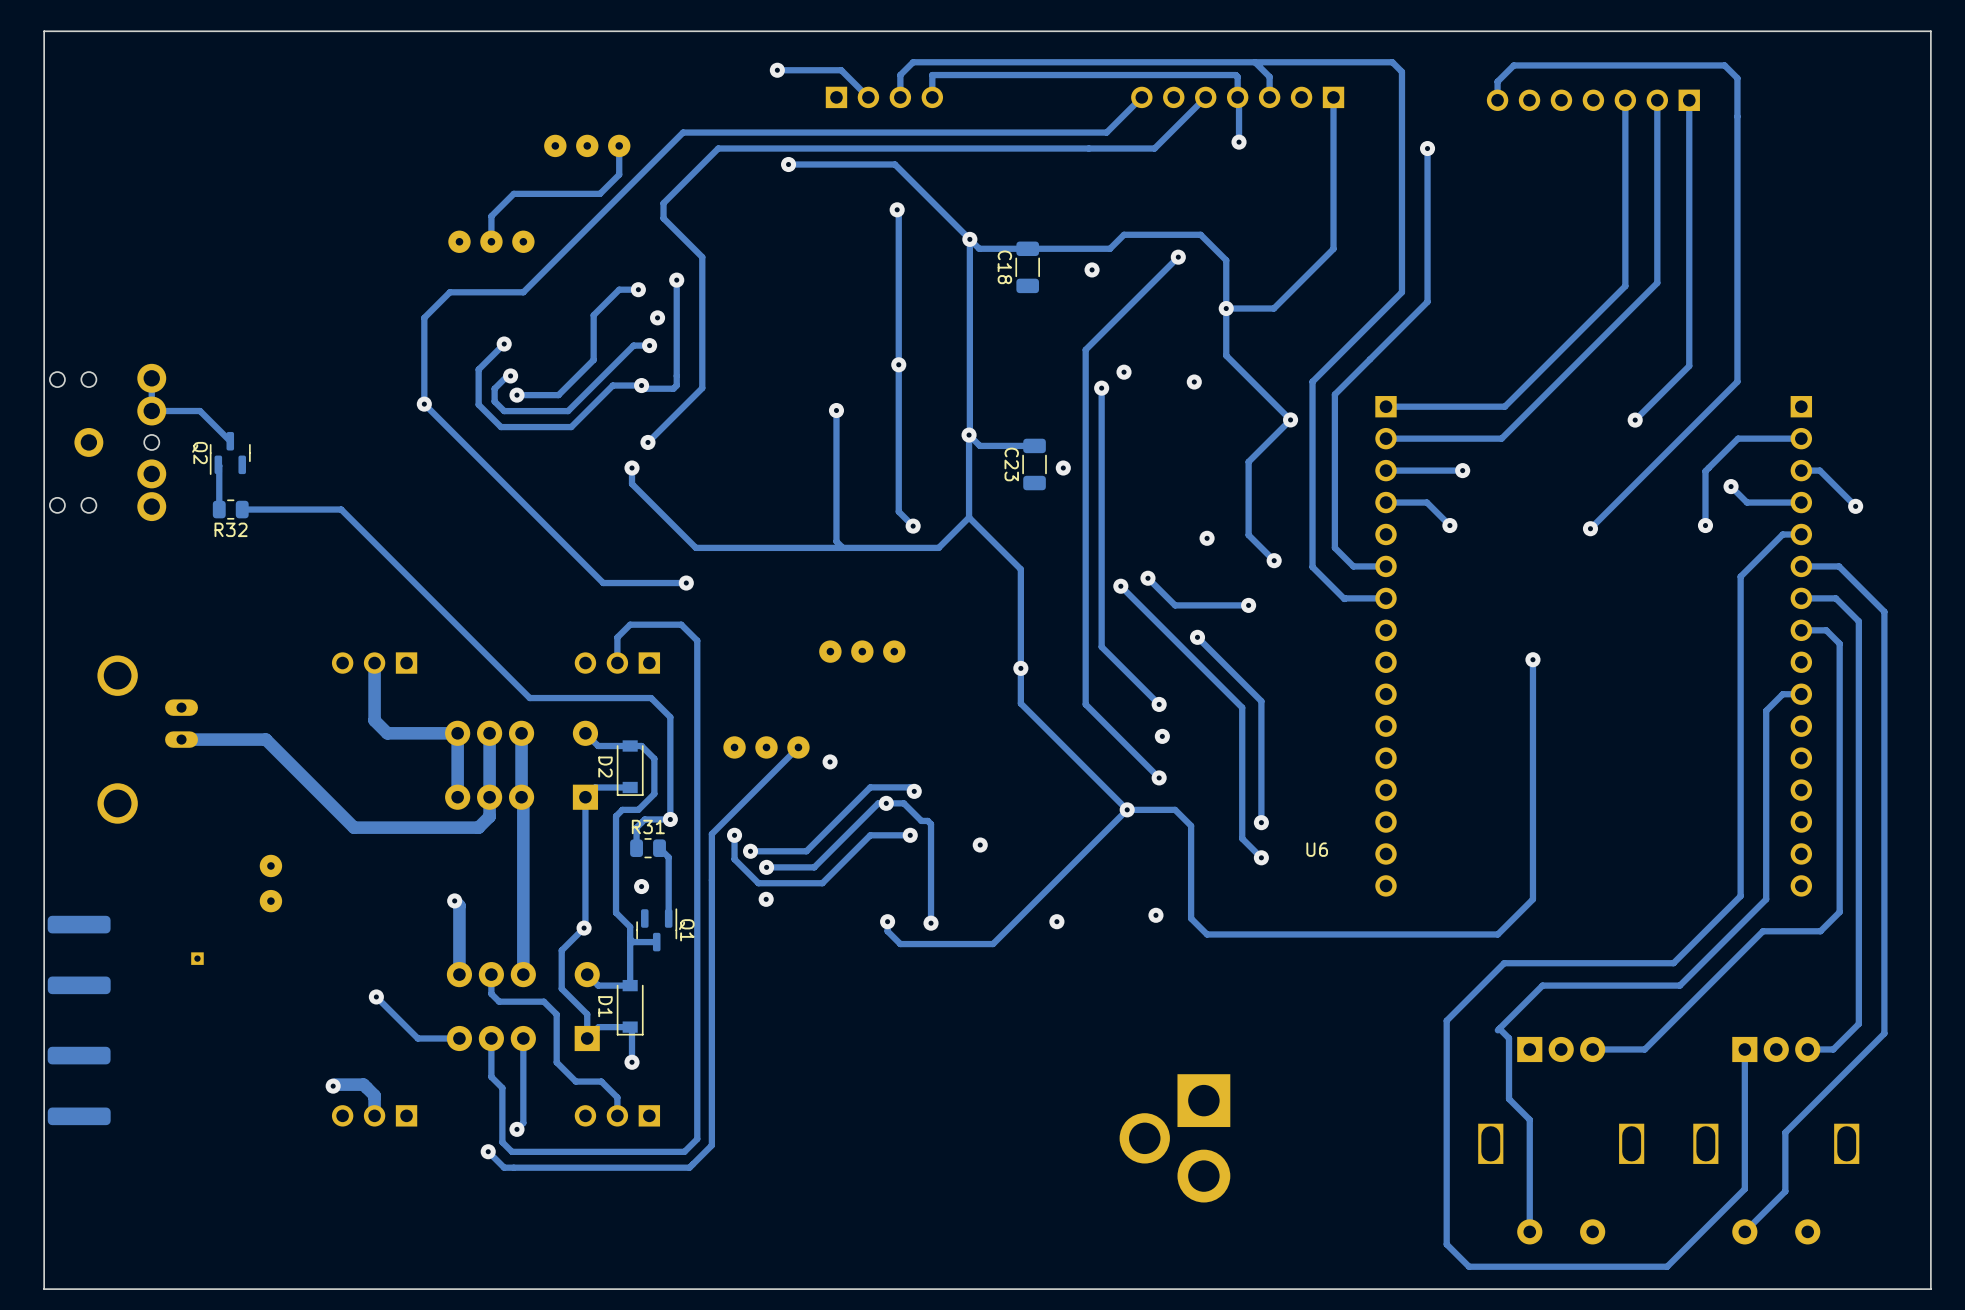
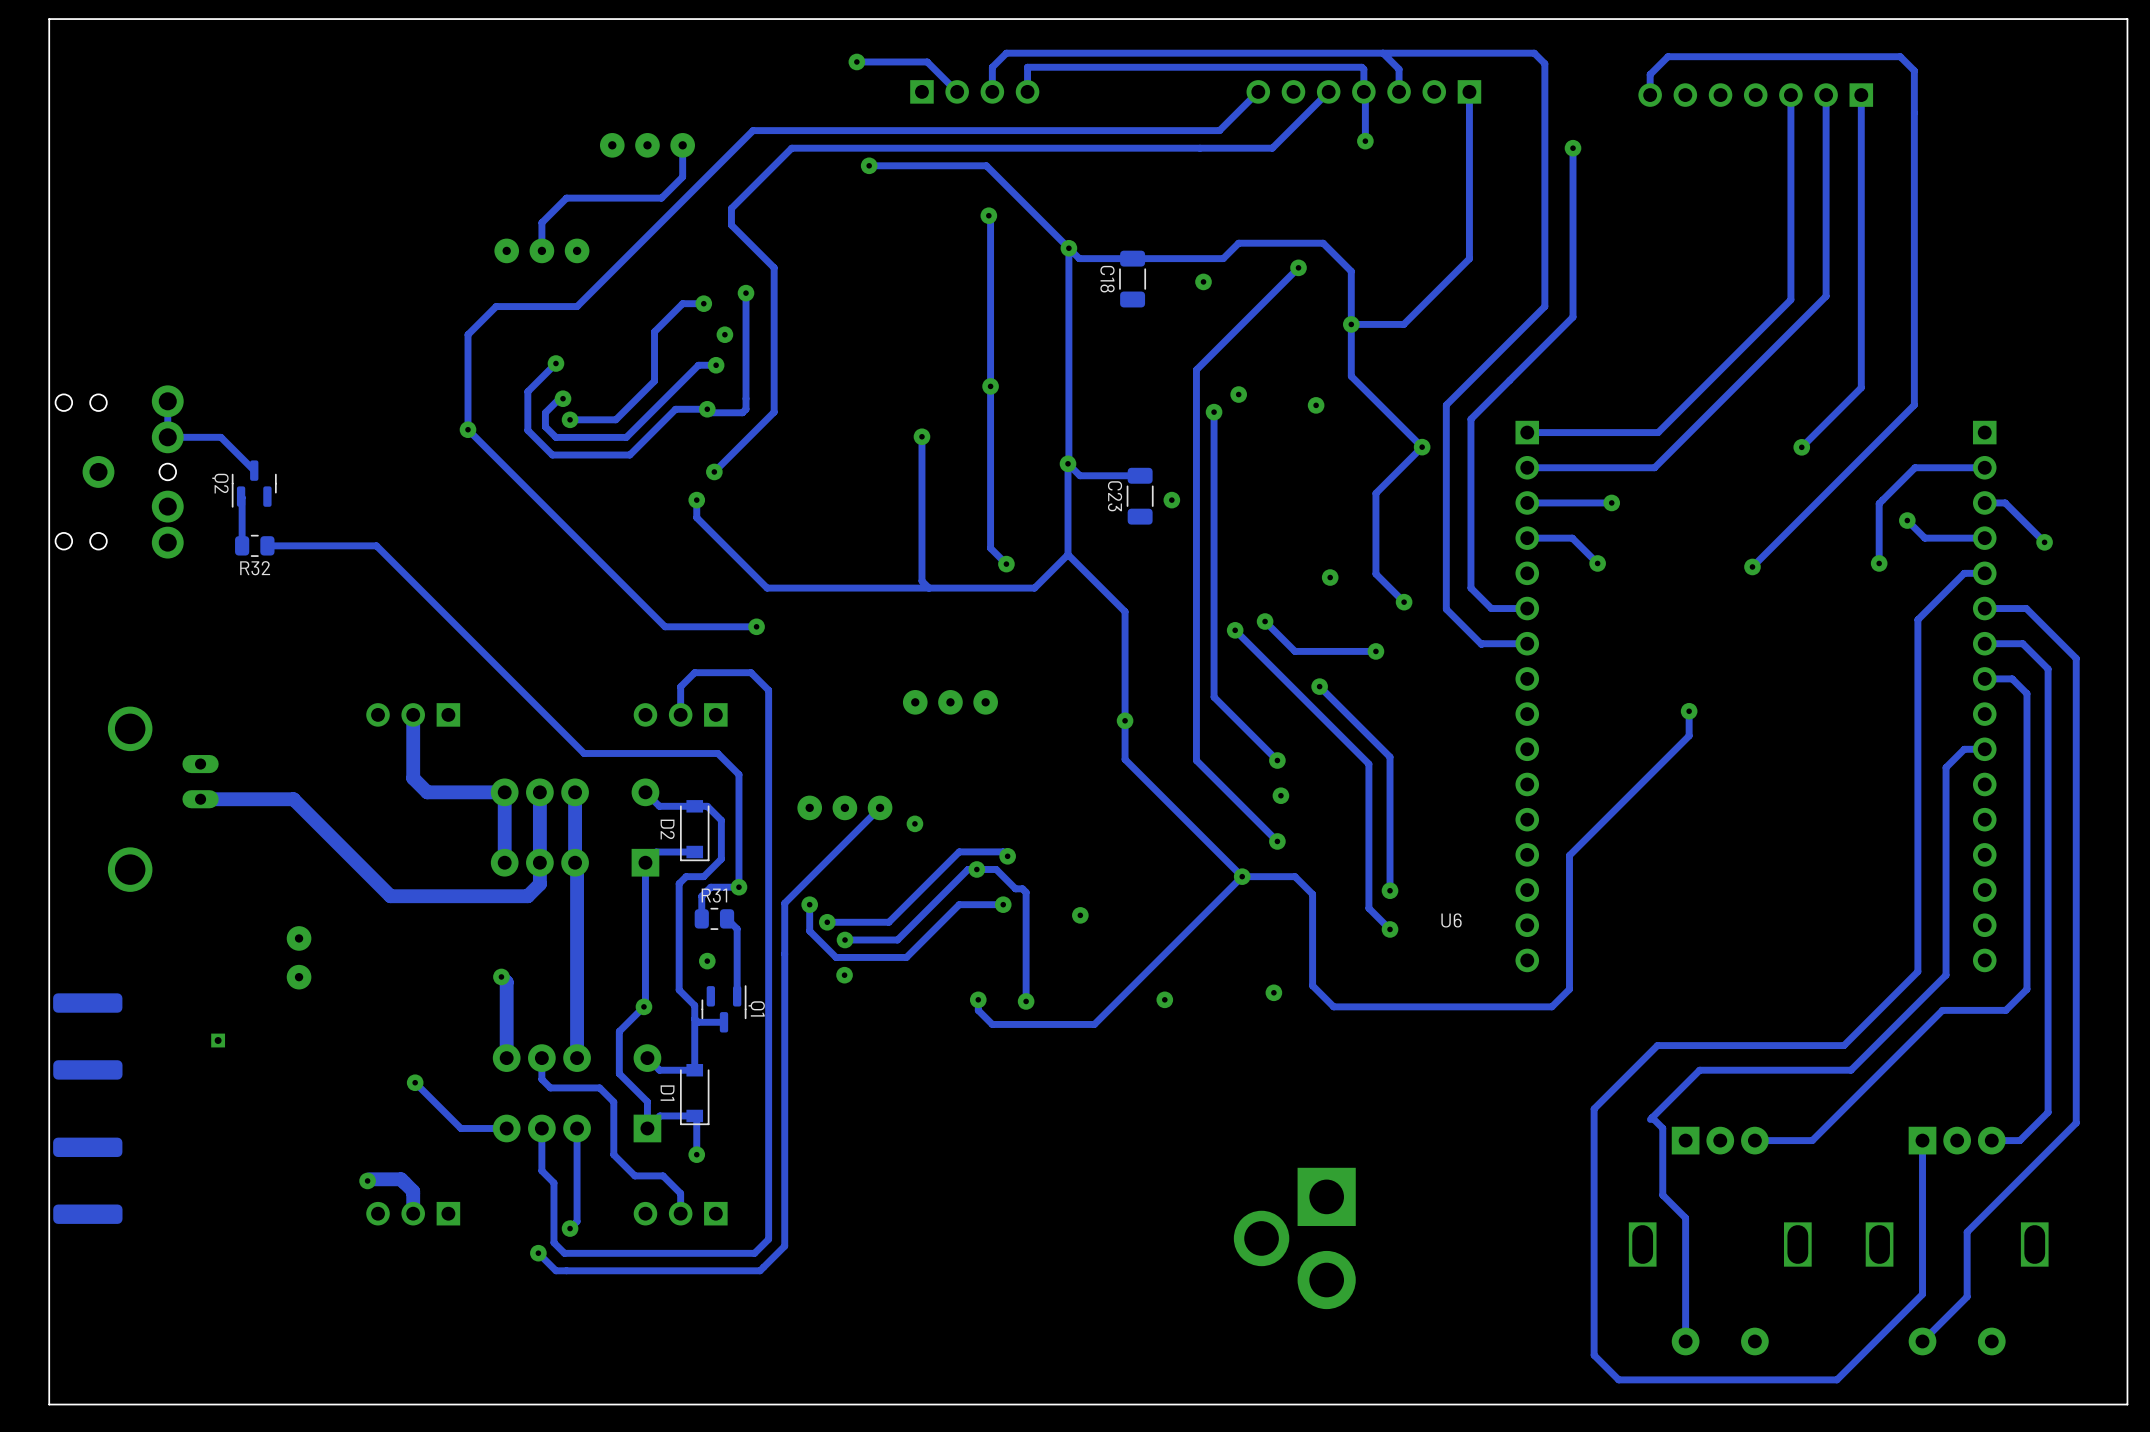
track: (1532, 682) (1532, 899) (1497, 934) (1207, 934) (1191, 918) (1191, 908) -> (1689, 735) (1569, 855) (1569, 989) (1551, 1006) (1333, 1006) (1312, 985)

